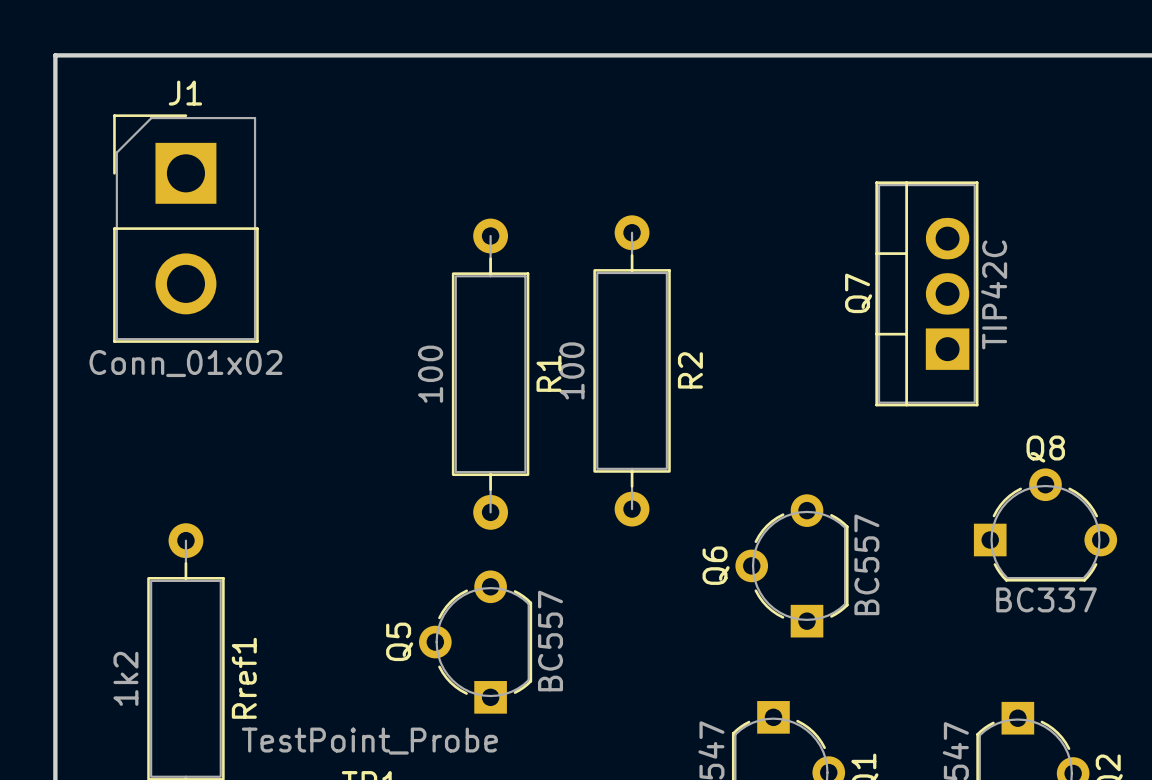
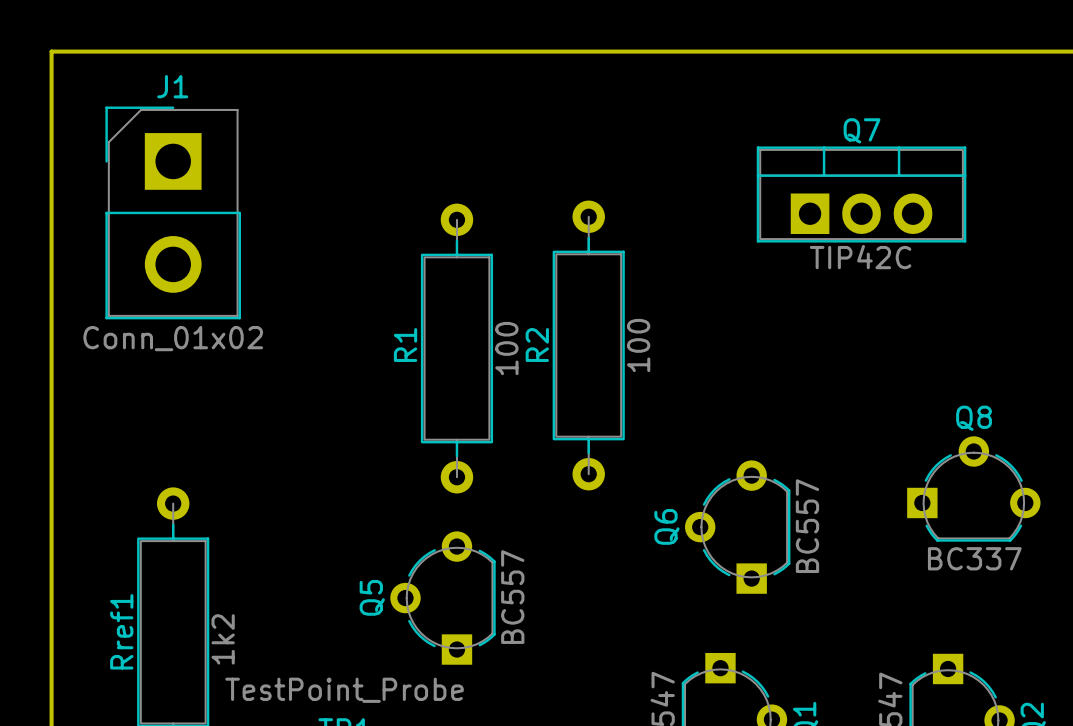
Q7 rotation: 0° (926, 293) -> 90° clockwise (861, 194)
R2 value position: 100 (572, 370) -> 100 (638, 345)
R2 name position: R2 (690, 370) -> R2 (537, 345)
R1 name position: R1 (548, 373) -> R1 (405, 345)
R1 value position: 100 (430, 374) -> 100 (506, 348)
Rref1 value position: 1k2 (125, 678) -> 1k2 (223, 639)
Rref1 name position: Rref1 (244, 678) -> Rref1 (121, 631)

